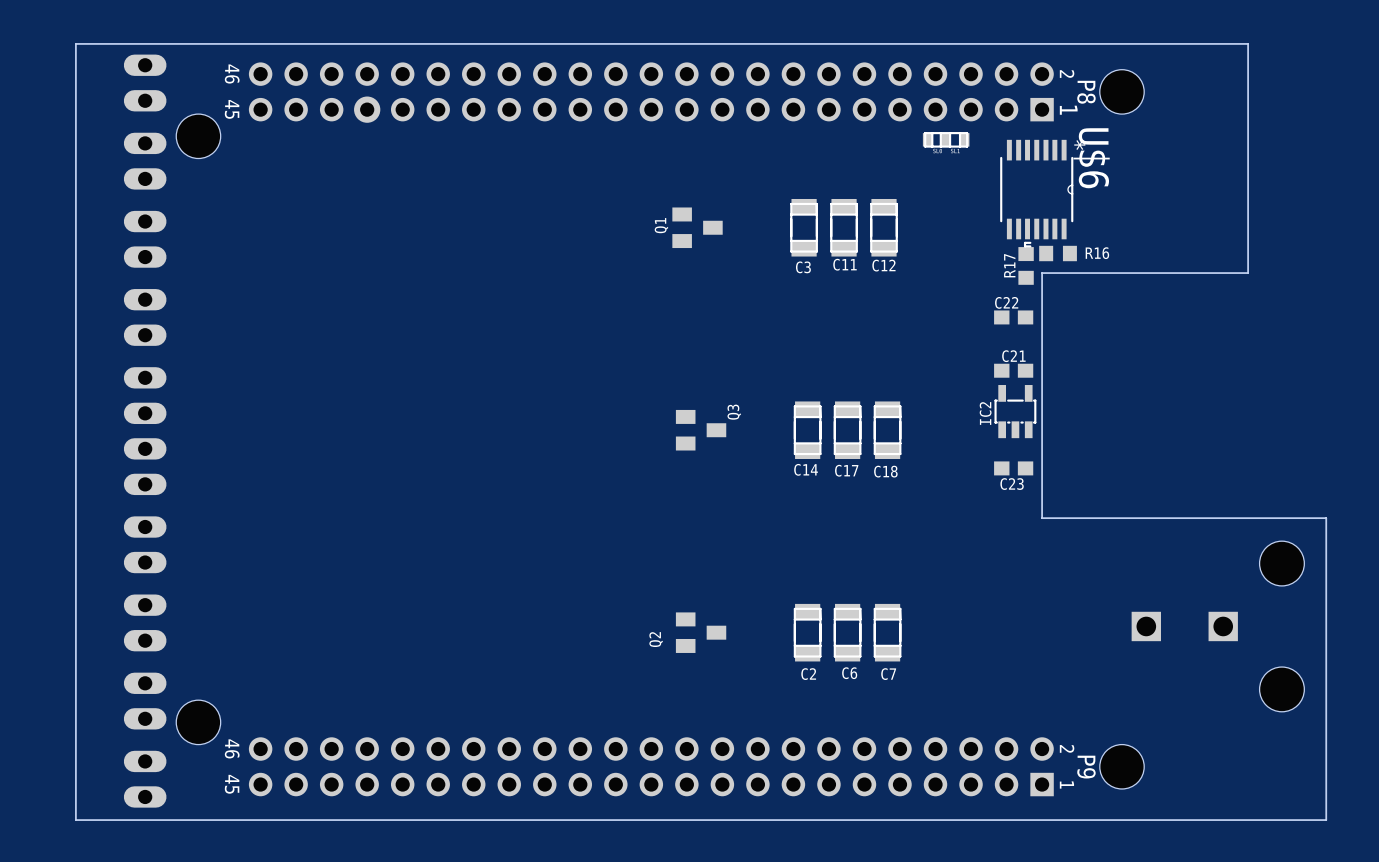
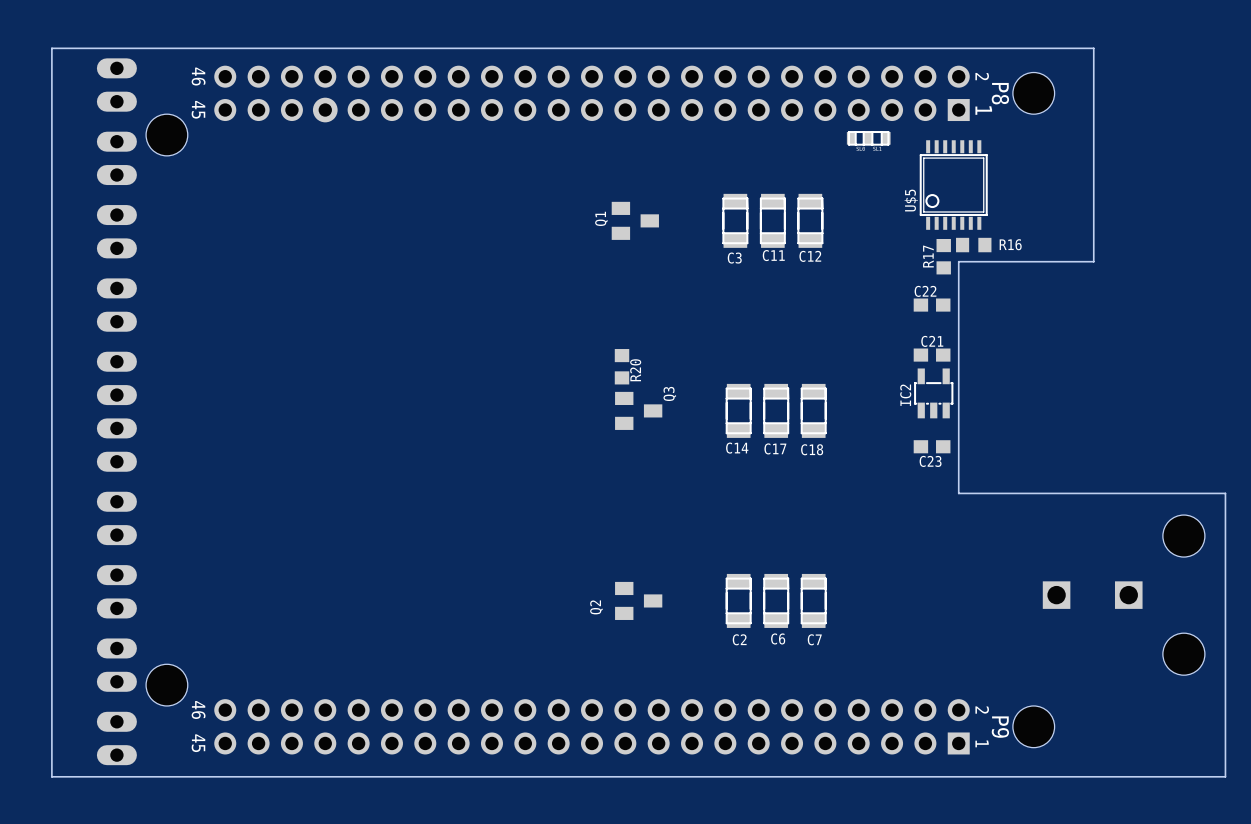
board edge: (1185, 43) (1248, 43) (1248, 273) (1042, 273) -> (1093, 48) (1093, 261) (958, 261) (958, 263)
U$5: none -> (953, 185)
U$6: (1036, 193) -> none
R20: none -> (622, 366)

